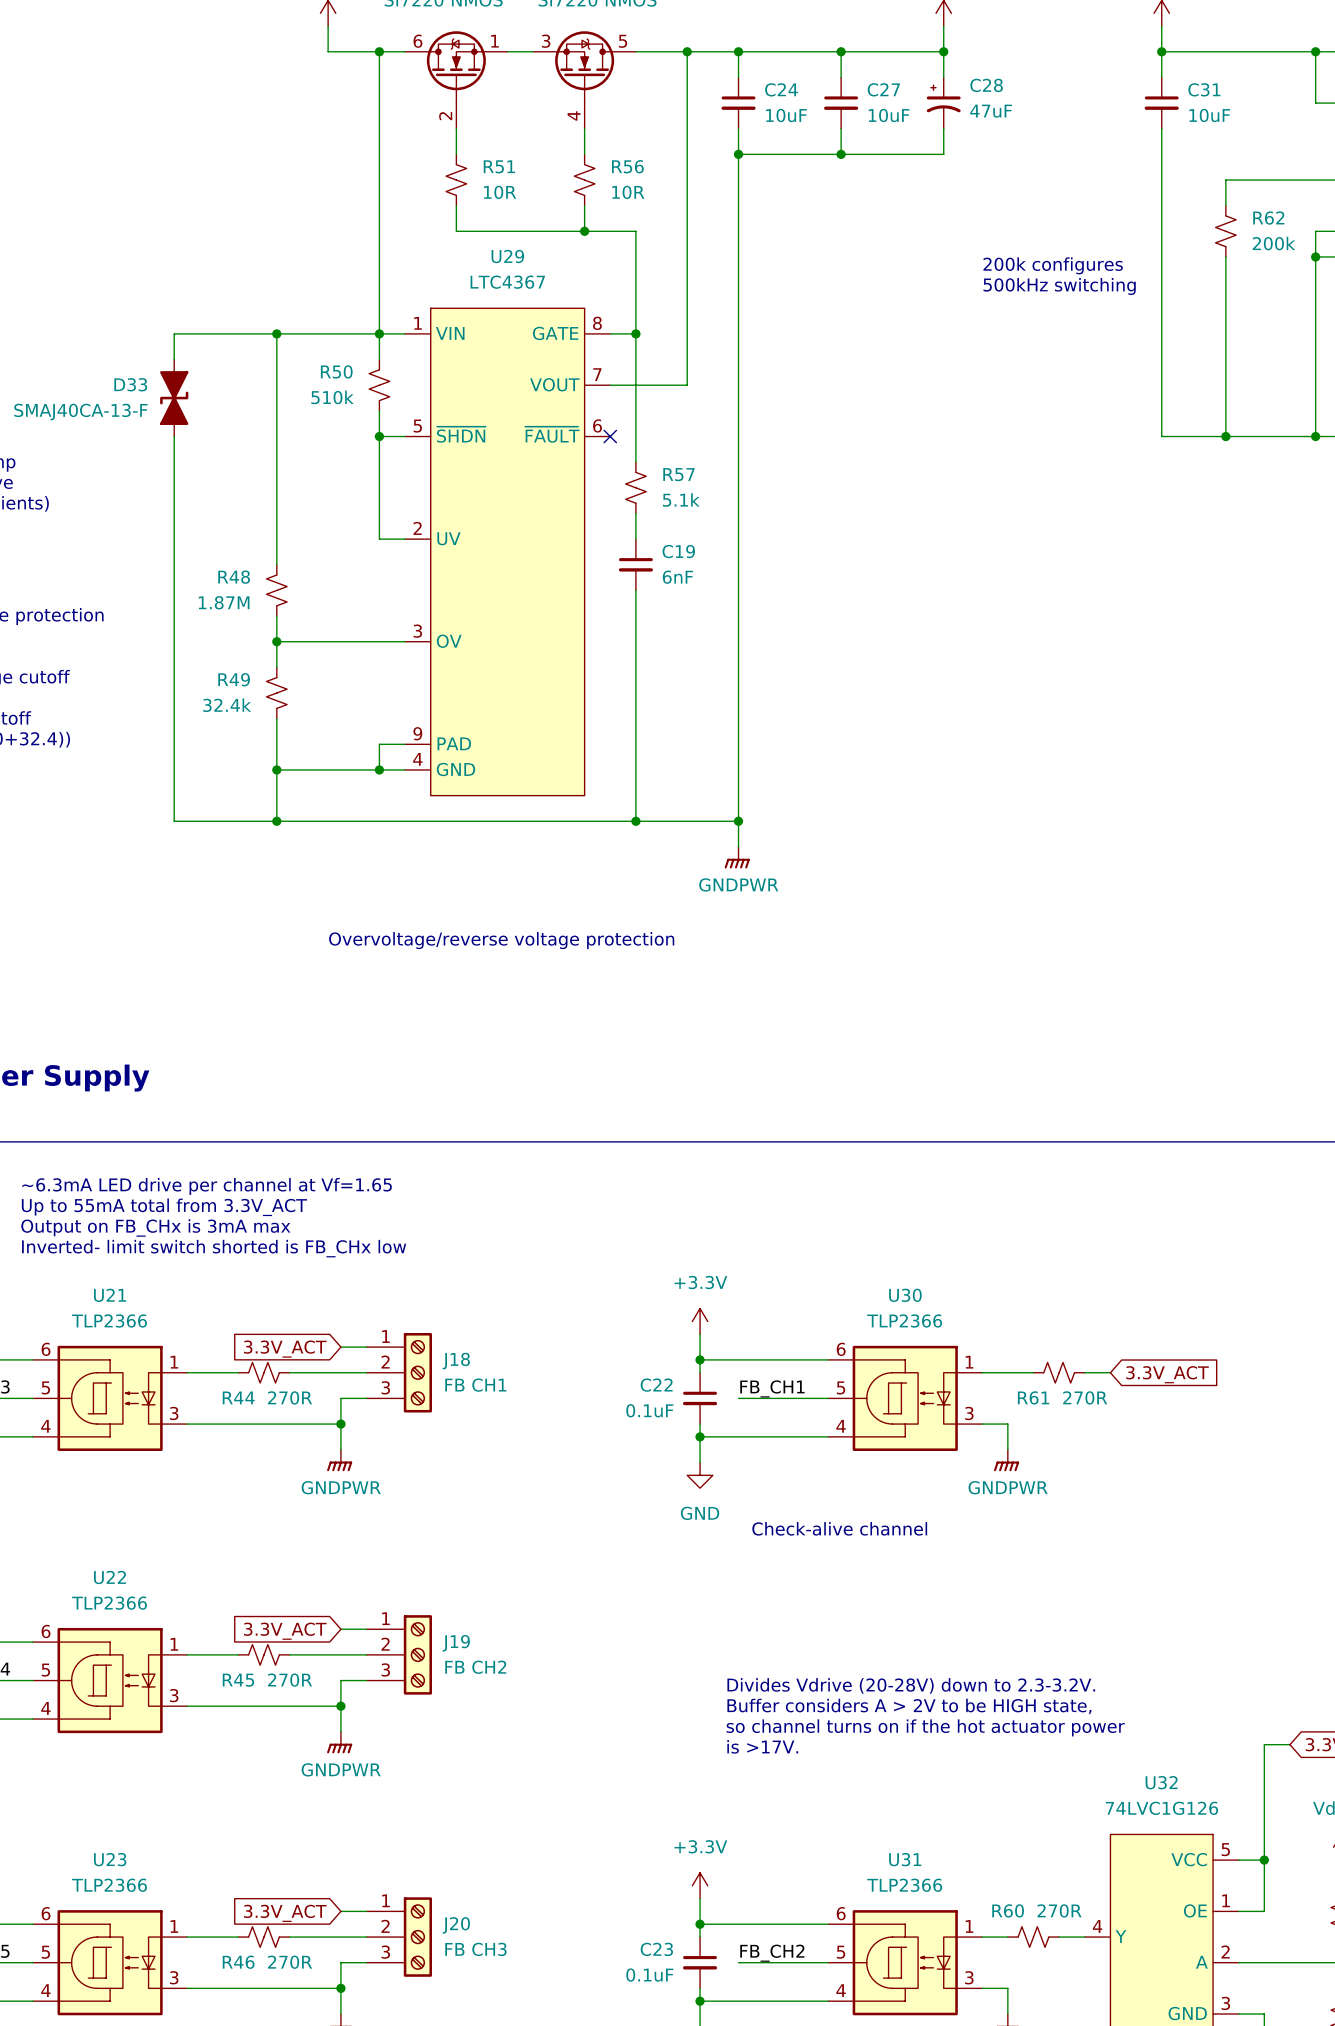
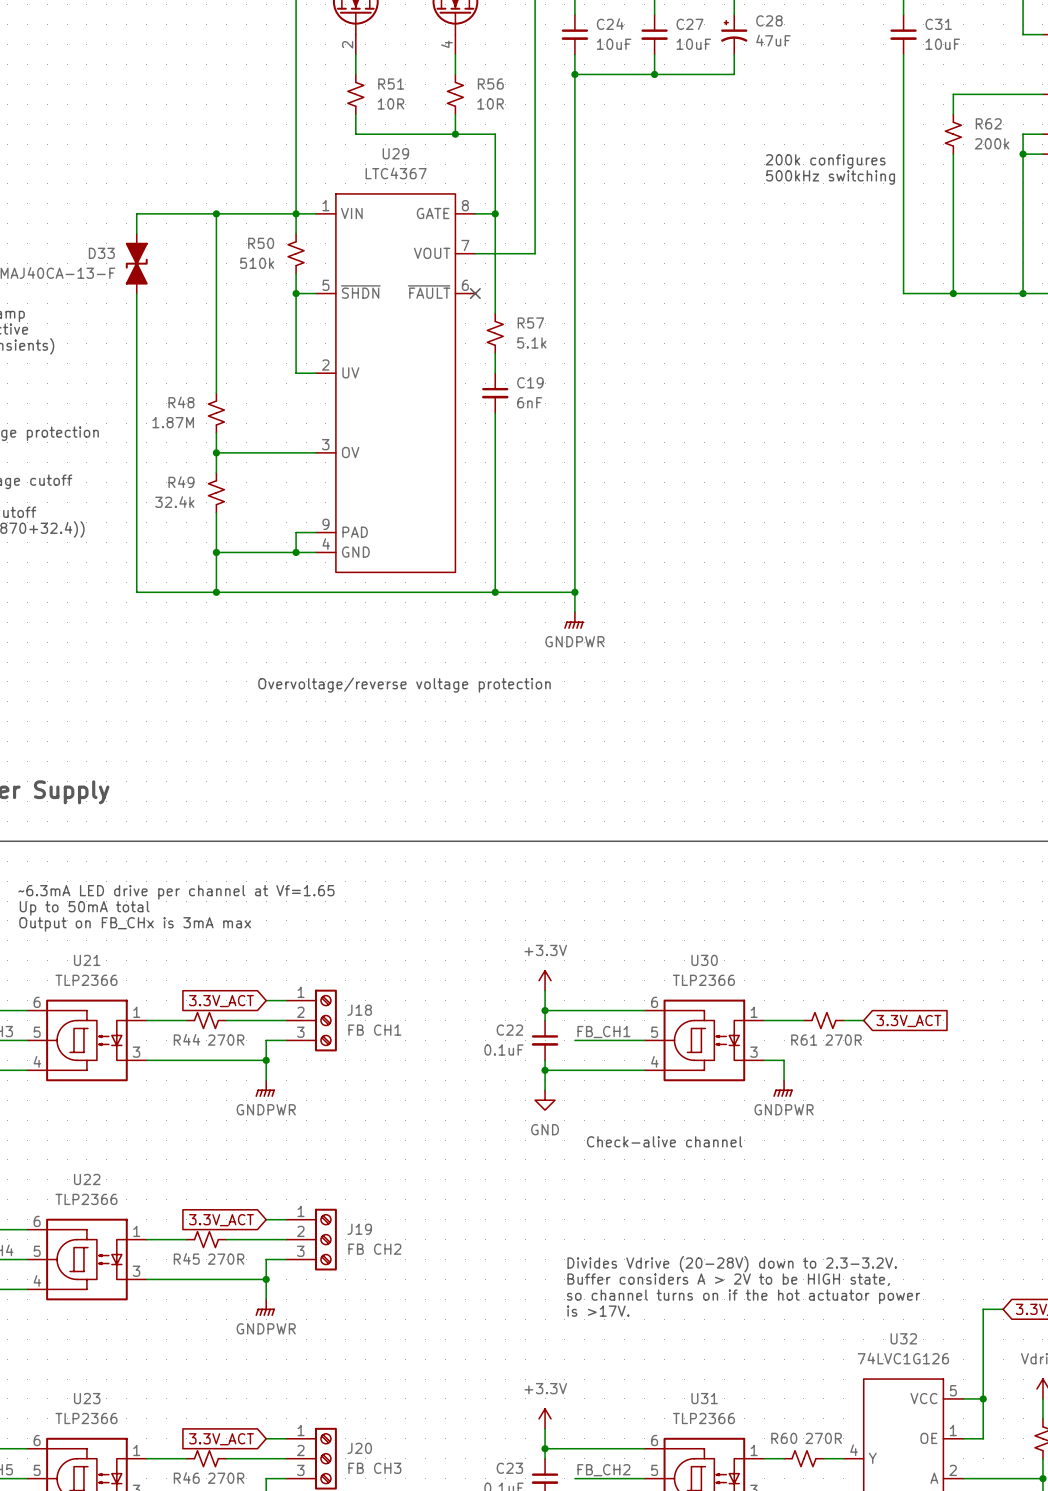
text: ~6.3mA LED drive per channel at Vf=1.65 (207, 1186) -> none
text: Up to 55mA total from 3.3V_ACT (164, 1207) -> ~6.3mA LED drive per channel at Vf=1.65 (176, 892)
text: Output on FB_CHx is 3mA max (155, 1227) -> Up to 50mA total (84, 908)
text: Inverted- limit switch shorted is FB_CHx low (214, 1248) -> Output on FB_CHx is 3mA max (135, 924)

